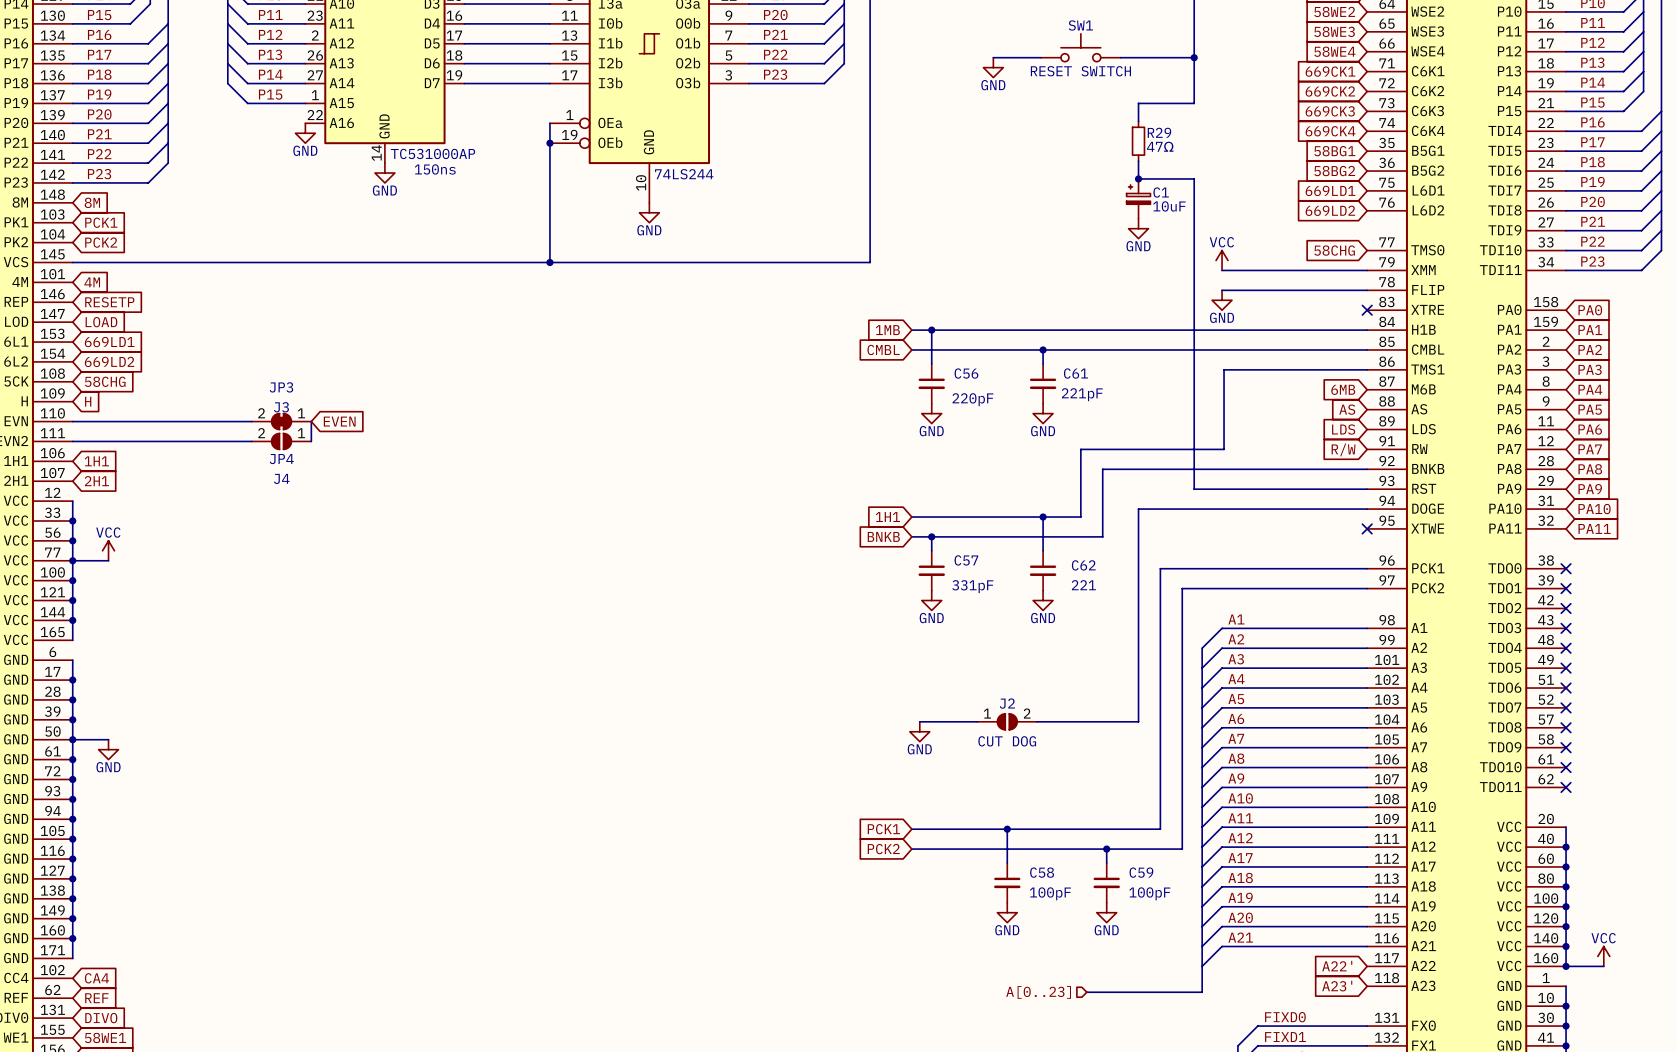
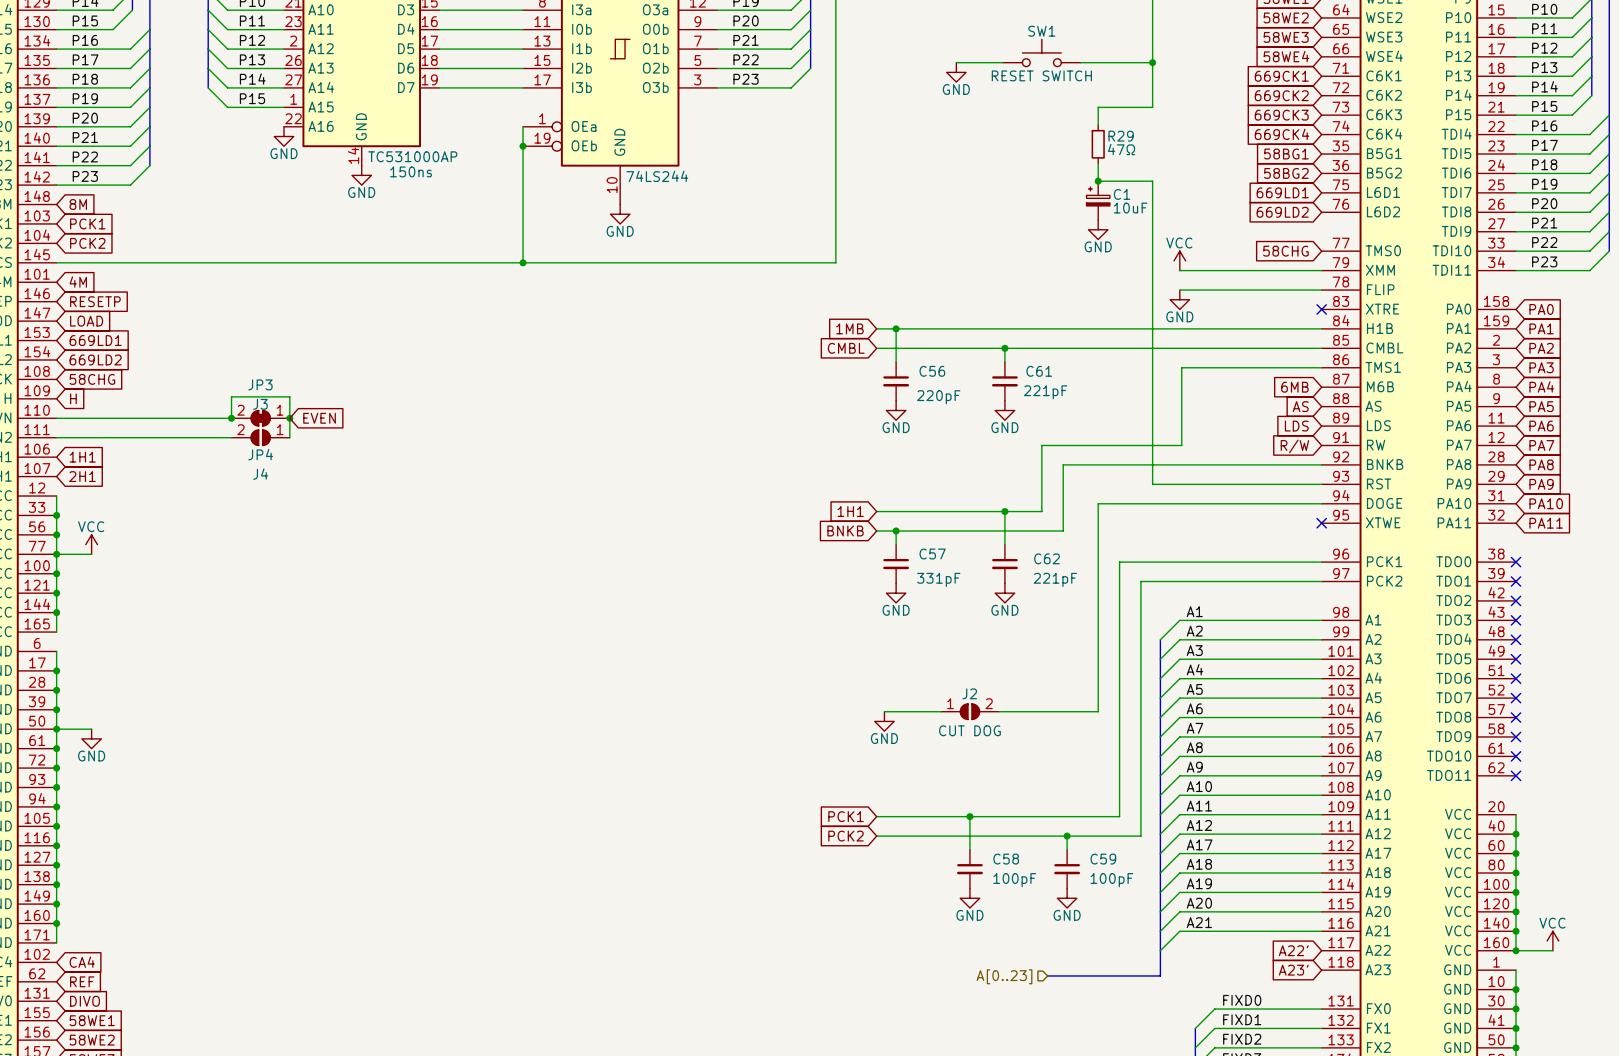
wire: none -> (231, 418) (231, 396) (289, 396) (289, 418)
junction: none -> (231, 418)
junction: none -> (289, 418)
C62 value: 221 (1083, 585) -> 221pF (1055, 579)

